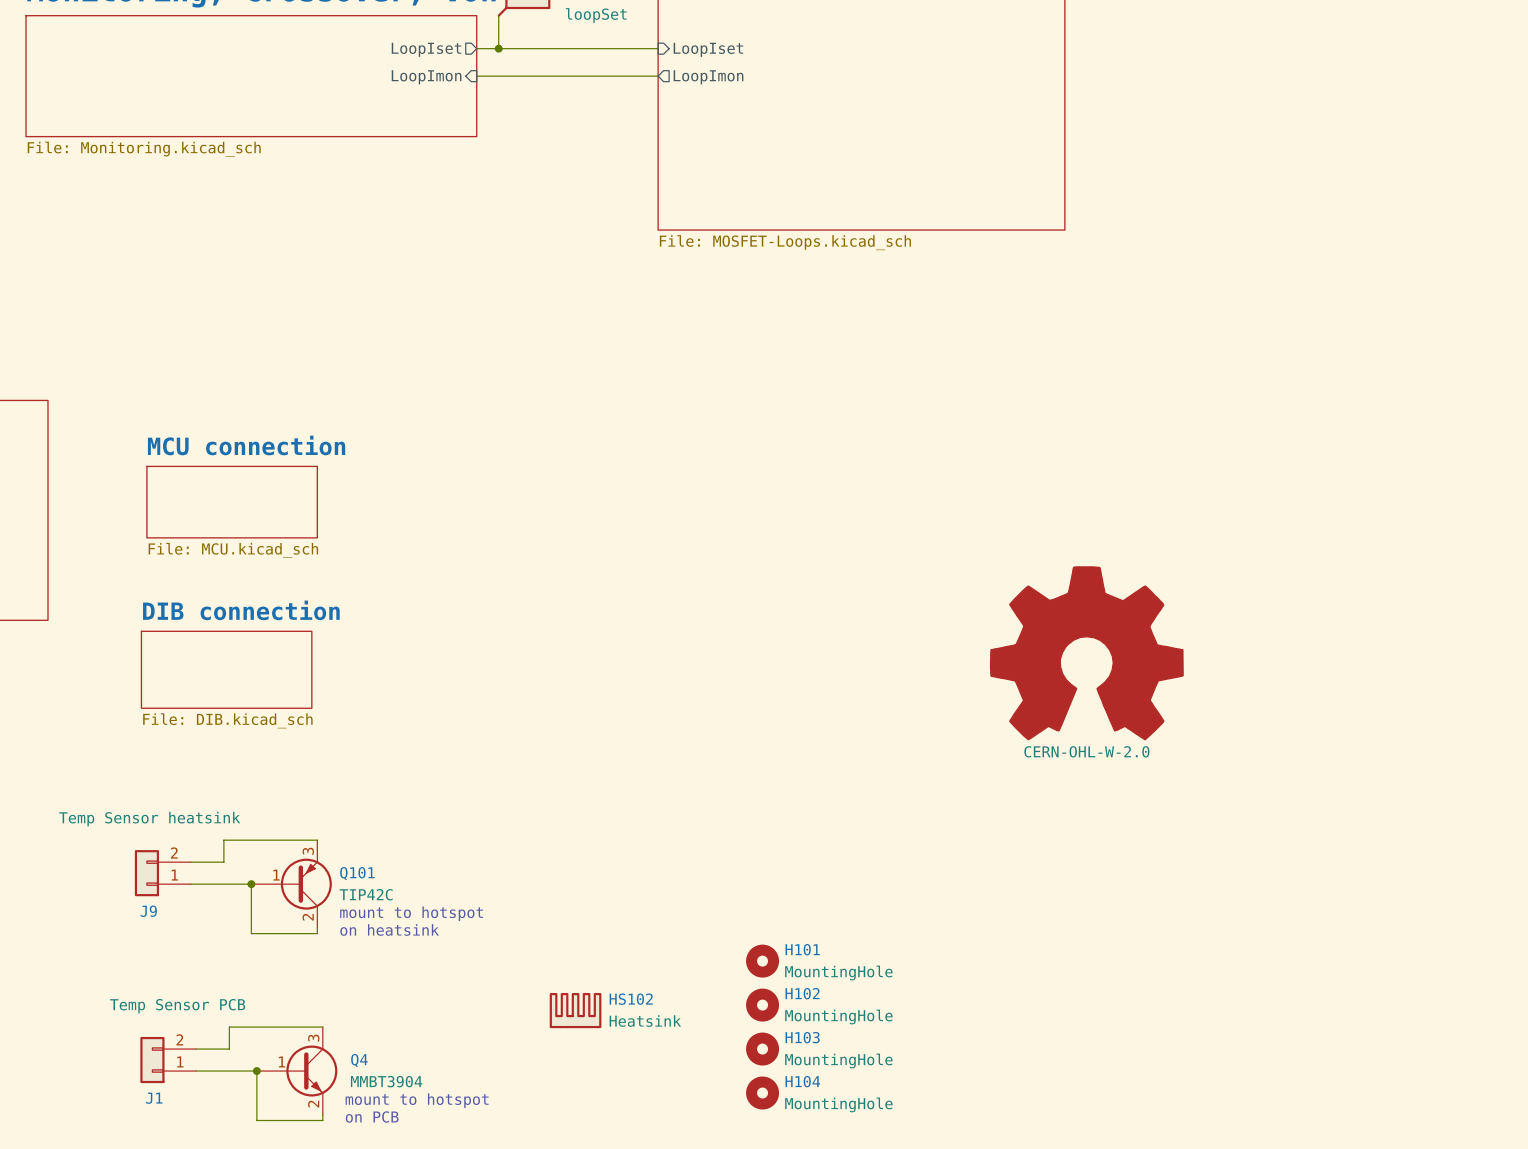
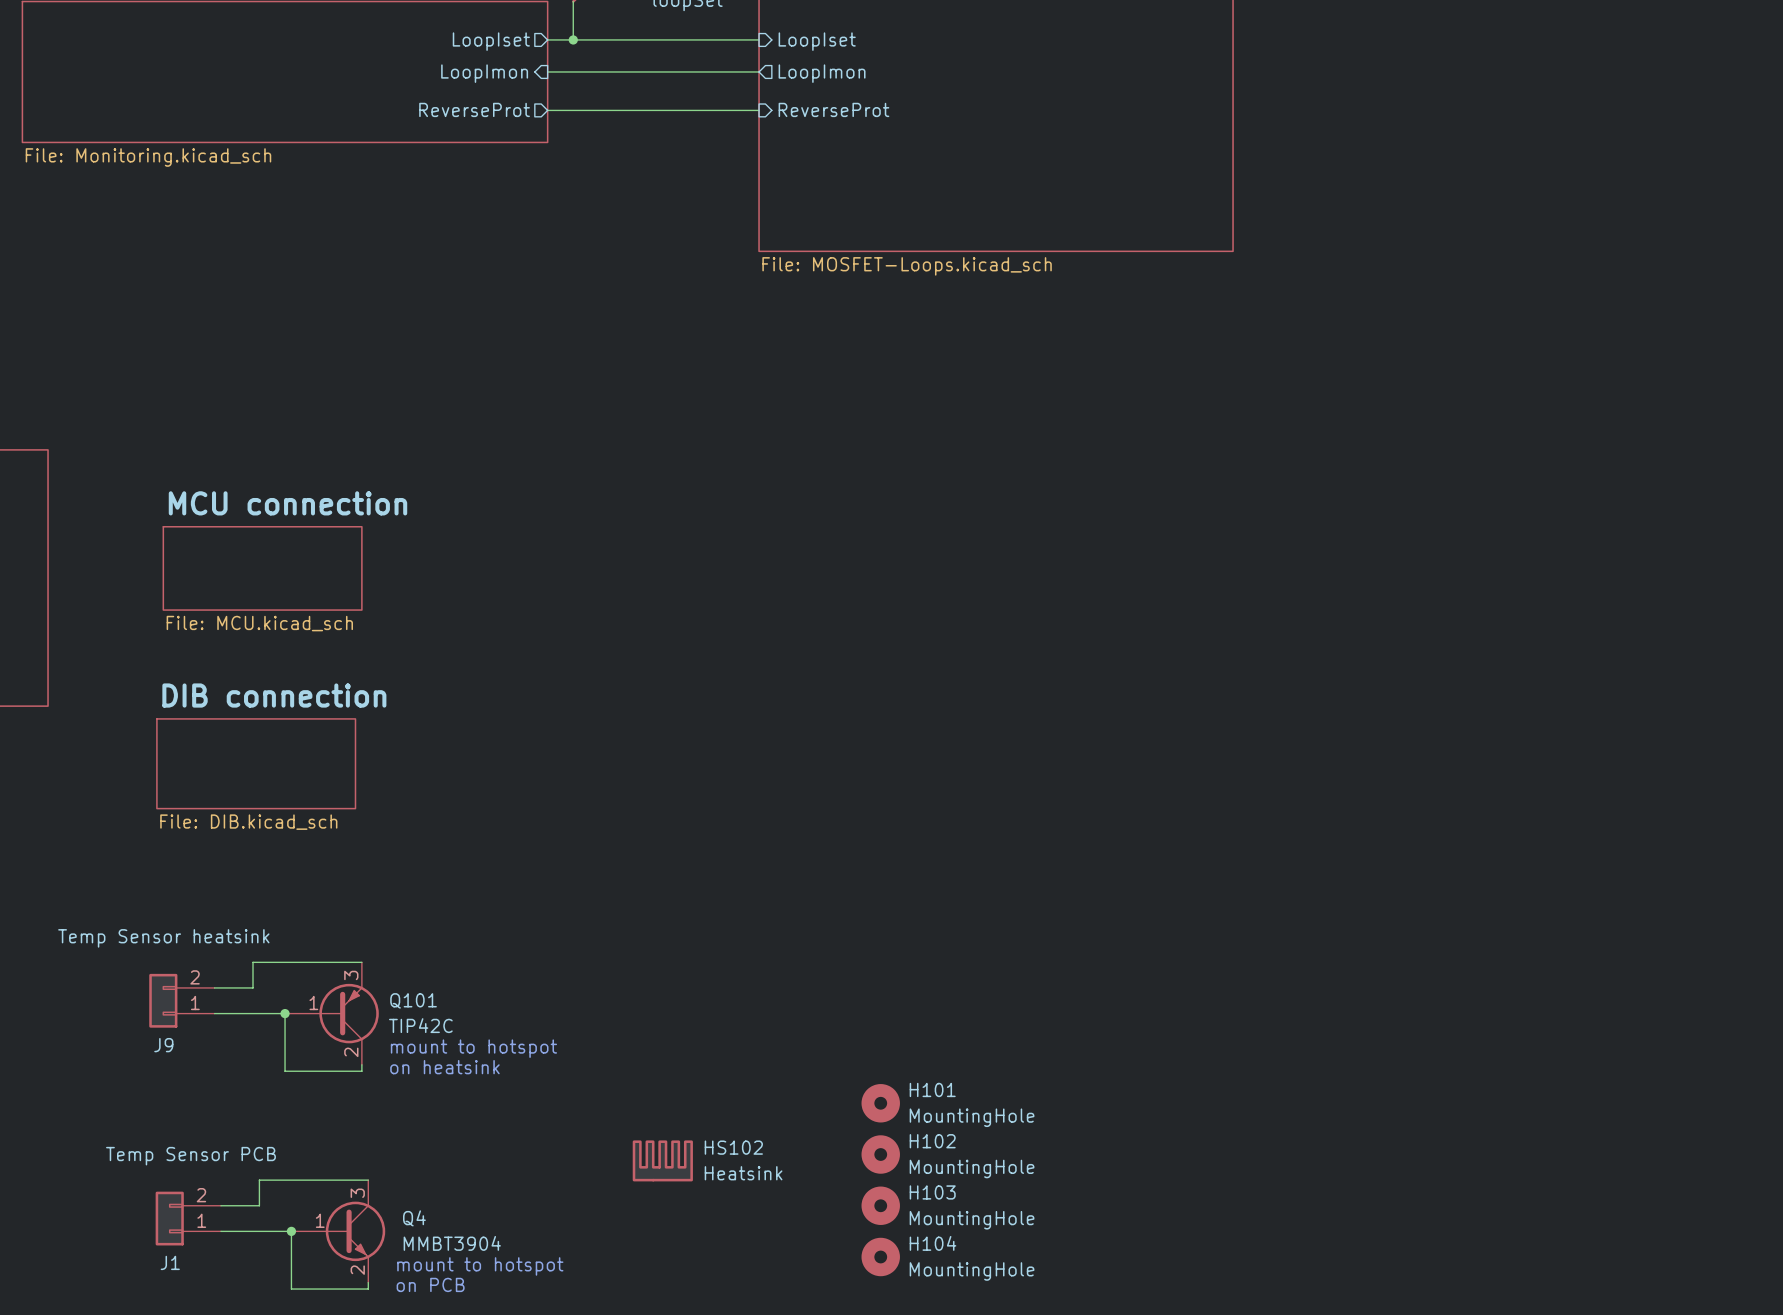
sheet pin: none -> ReverseProt (474, 109)
sheet pin: none -> ReverseProt (833, 109)
wire: none -> (547, 110) (759, 110)
part: CERN-OHL-W-2.0 (1086, 653) -> none

